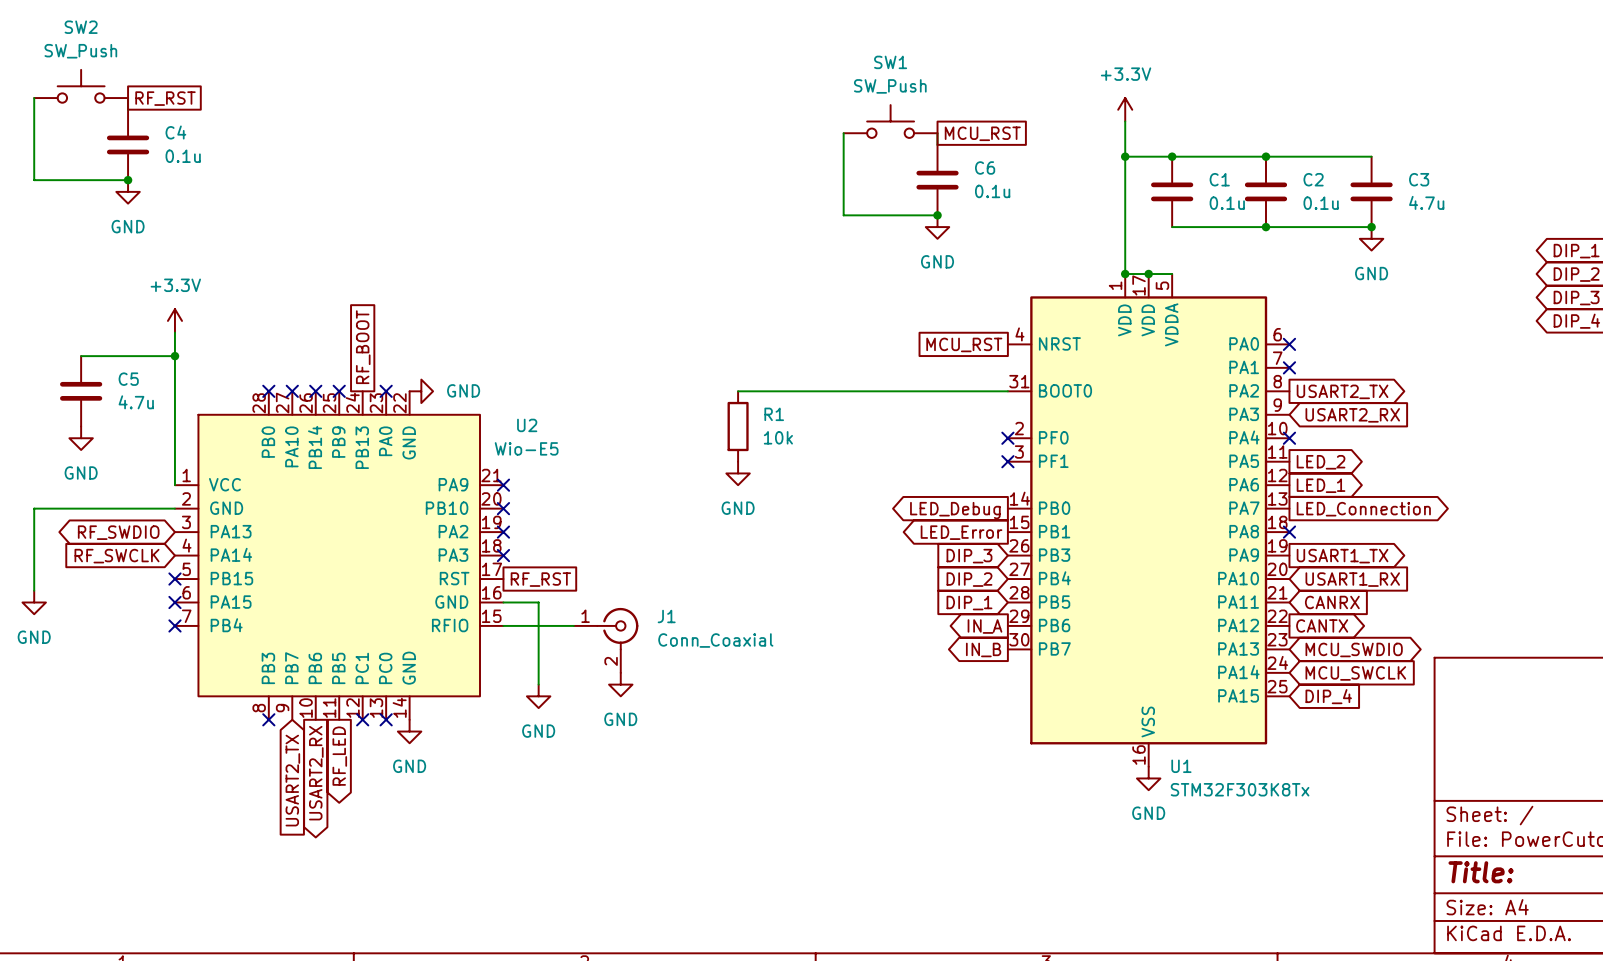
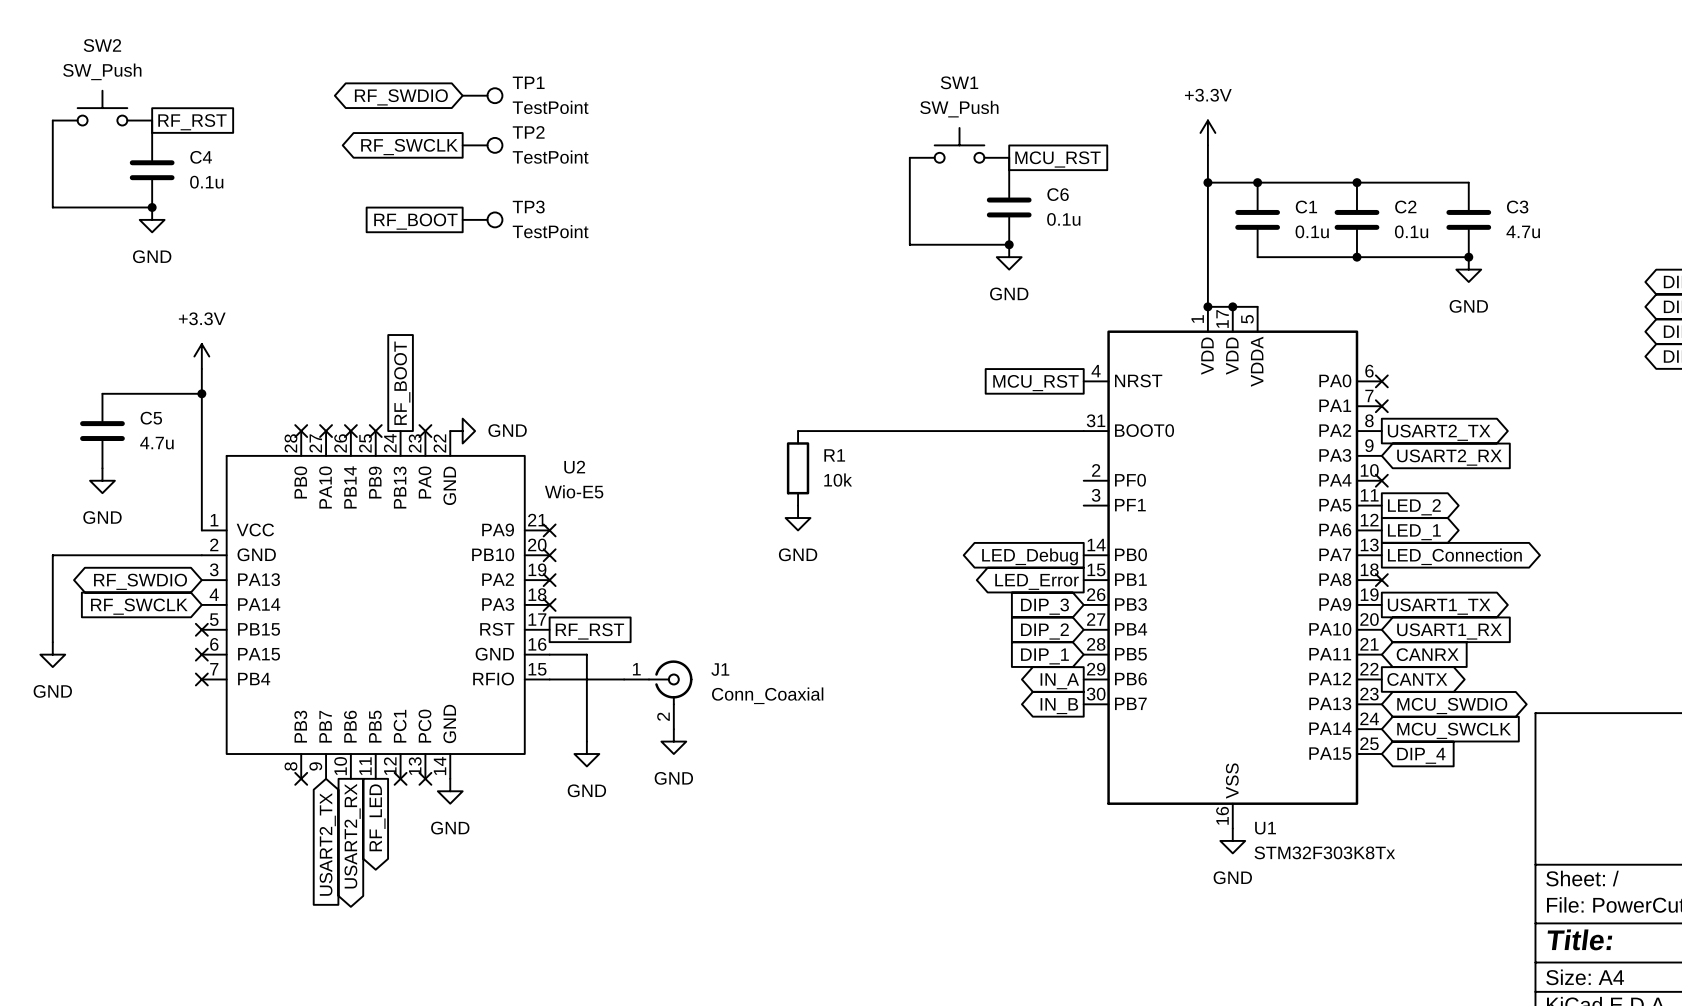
TP1: none -> TestPoint (482, 95)
global label: none -> RF_SWDIO (401, 97)
TP2: none -> TestPoint (482, 145)
global label: none -> RF_SWCLK (409, 147)
TP3: none -> TestPoint (482, 219)
global label: none -> RF_BOOT (415, 221)
no-connect mark: (1007, 438) -> none
no-connect mark: (1007, 461) -> none

